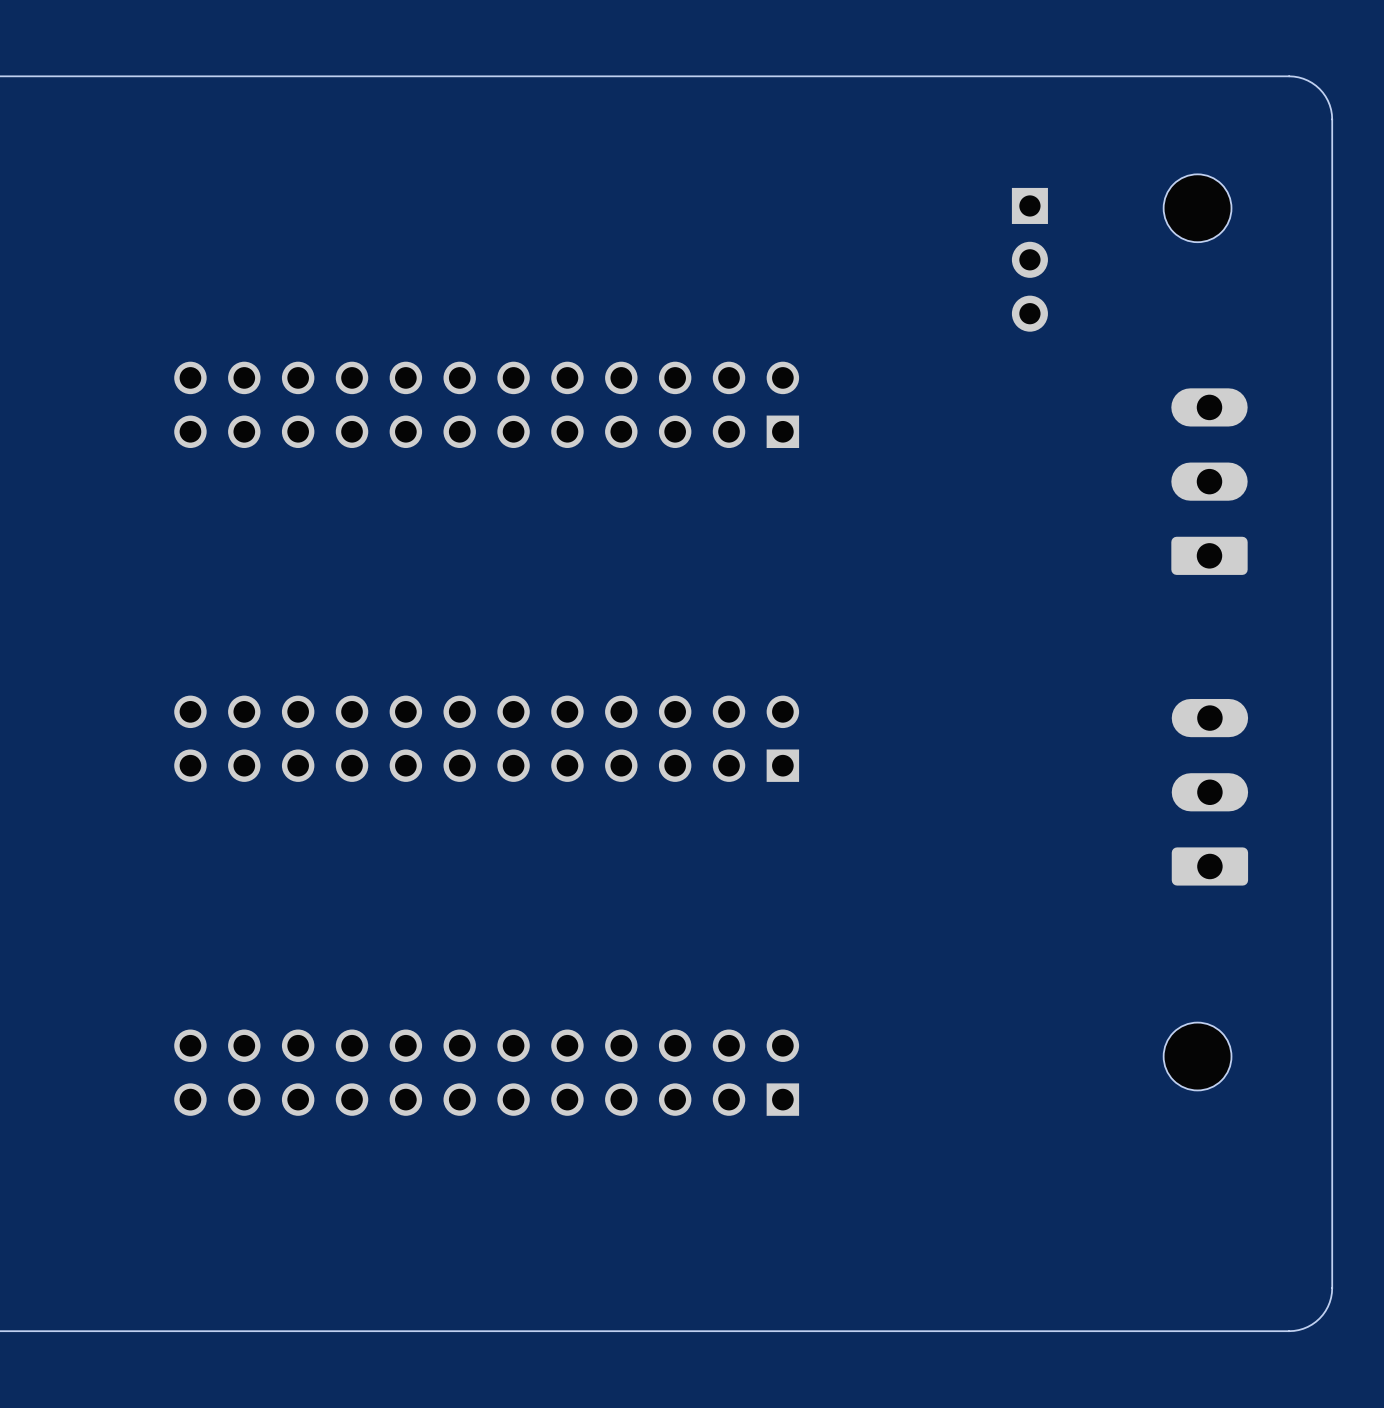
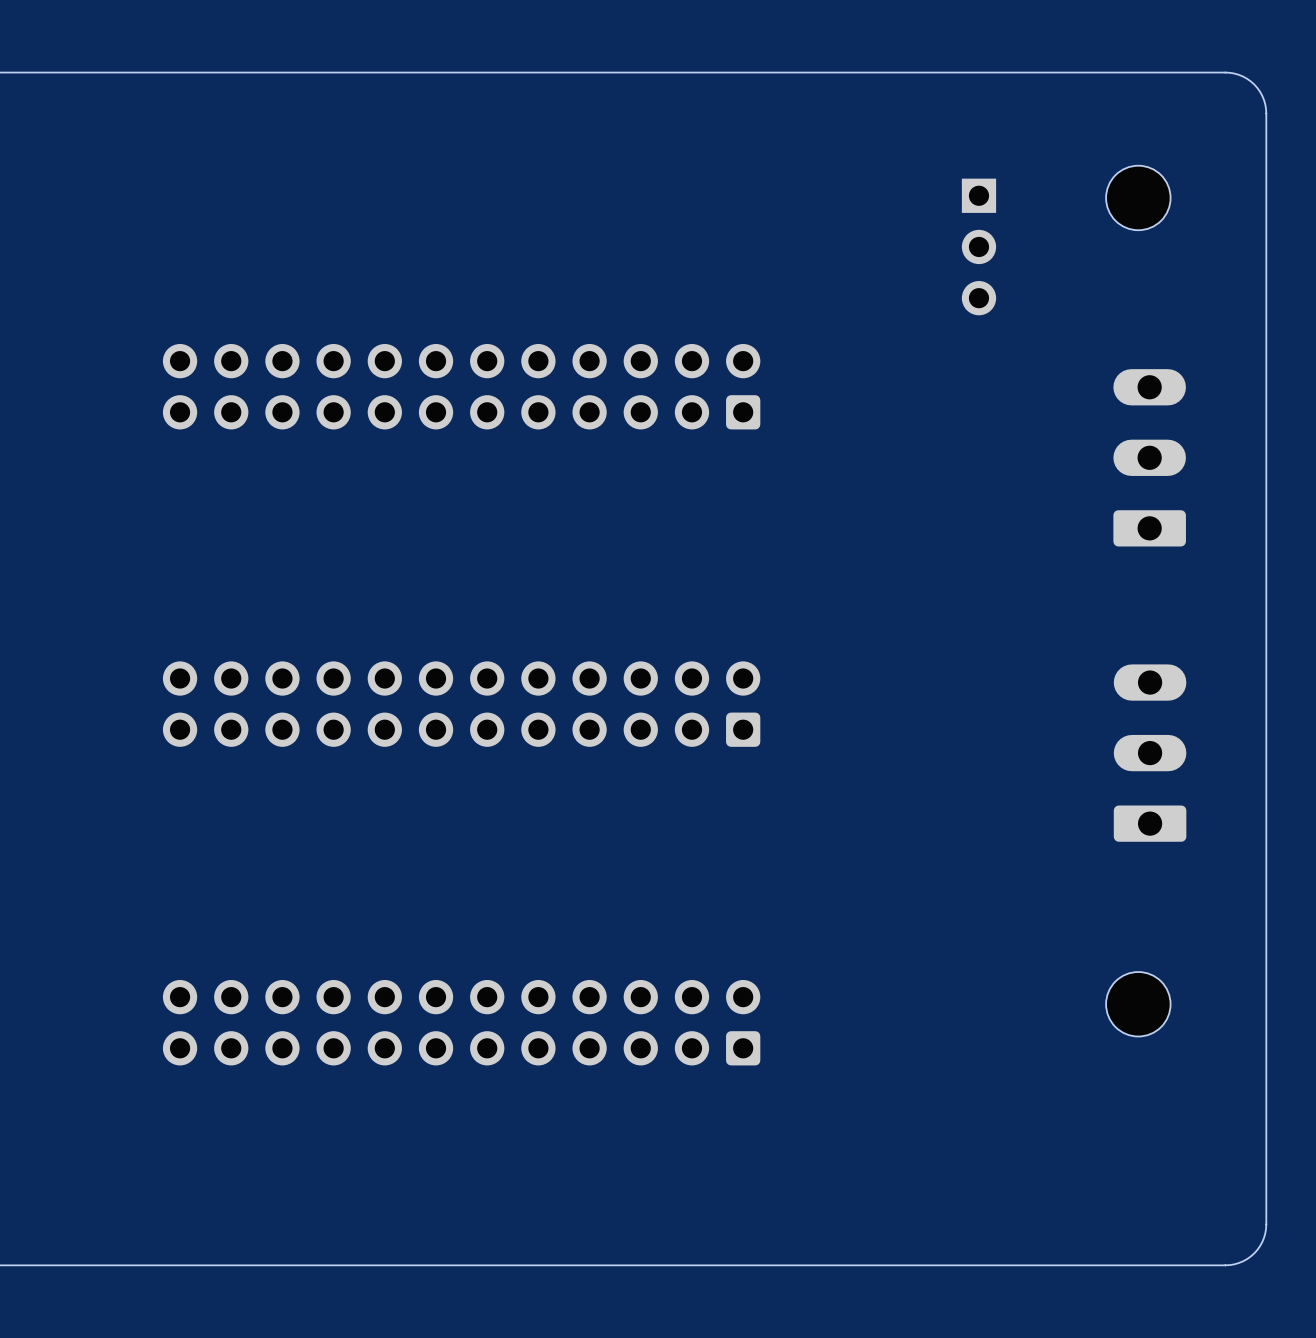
part footprint: [174, 361, 800, 448] -> [162, 343, 761, 430]
part footprint: [174, 695, 800, 782] -> [162, 661, 761, 747]
part footprint: [174, 1029, 800, 1116] -> [162, 979, 761, 1066]

